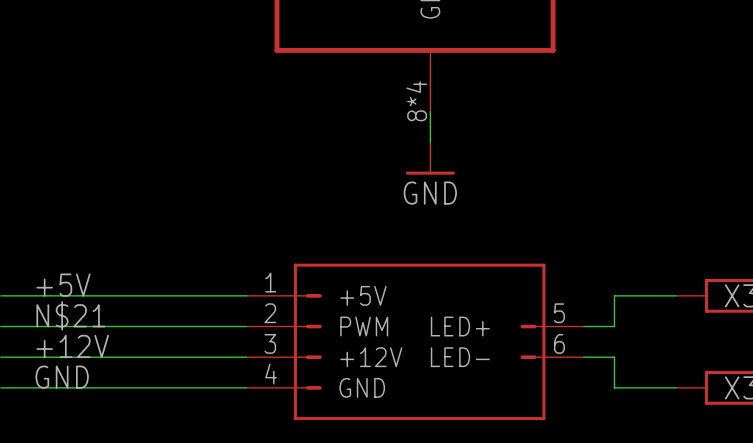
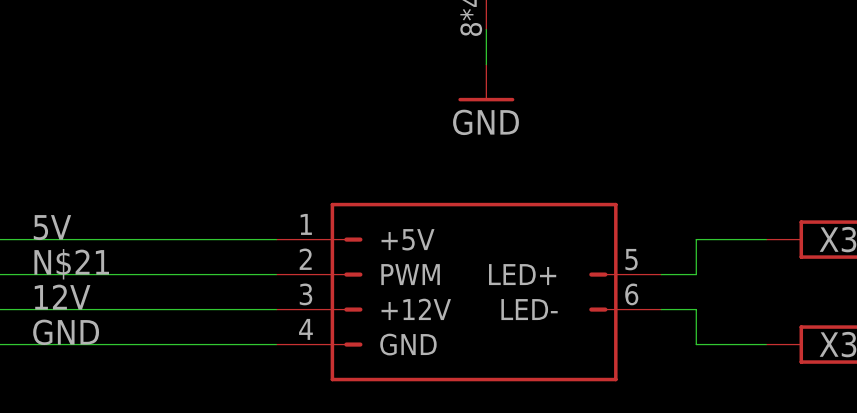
label: +5V (63, 285) -> 5V (52, 227)
label: +12V (72, 346) -> 12V (62, 297)

